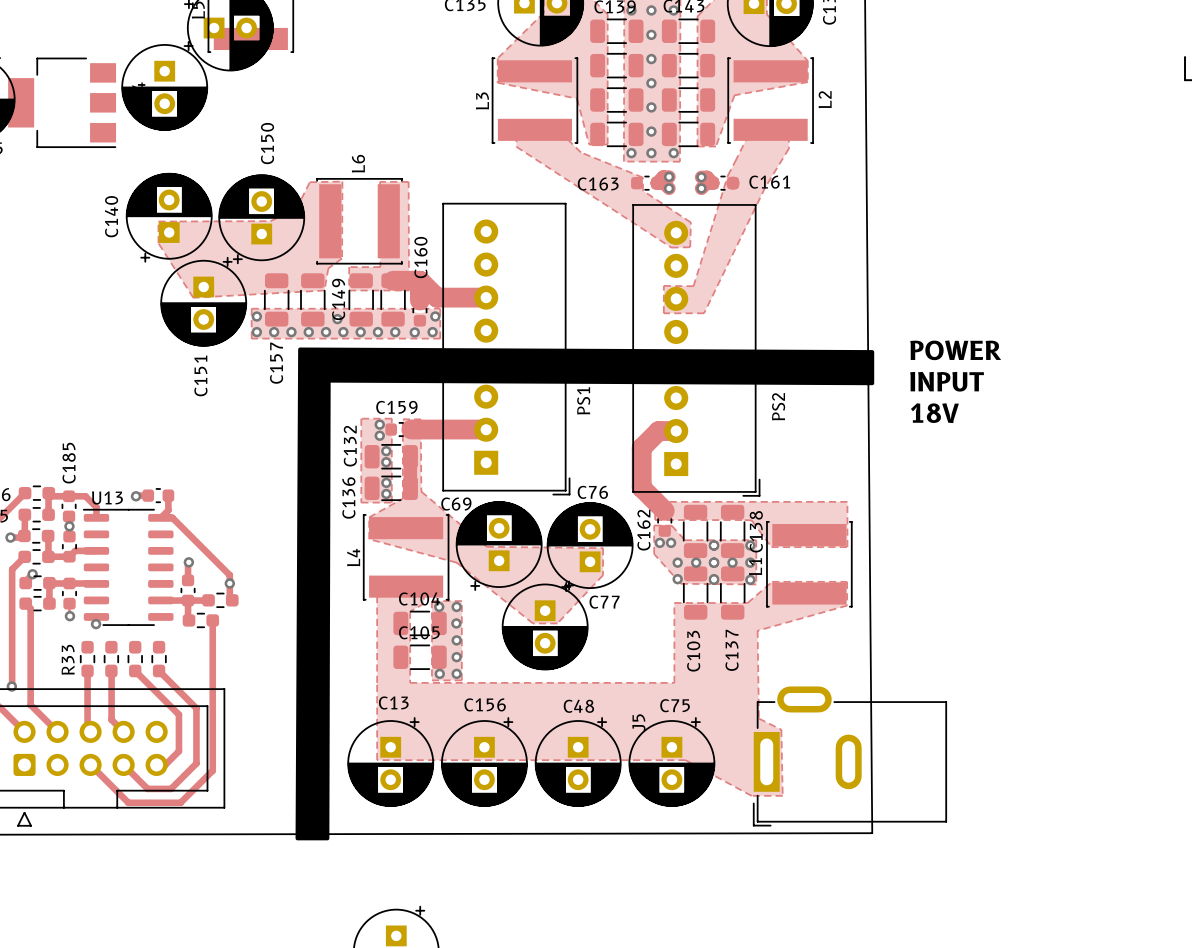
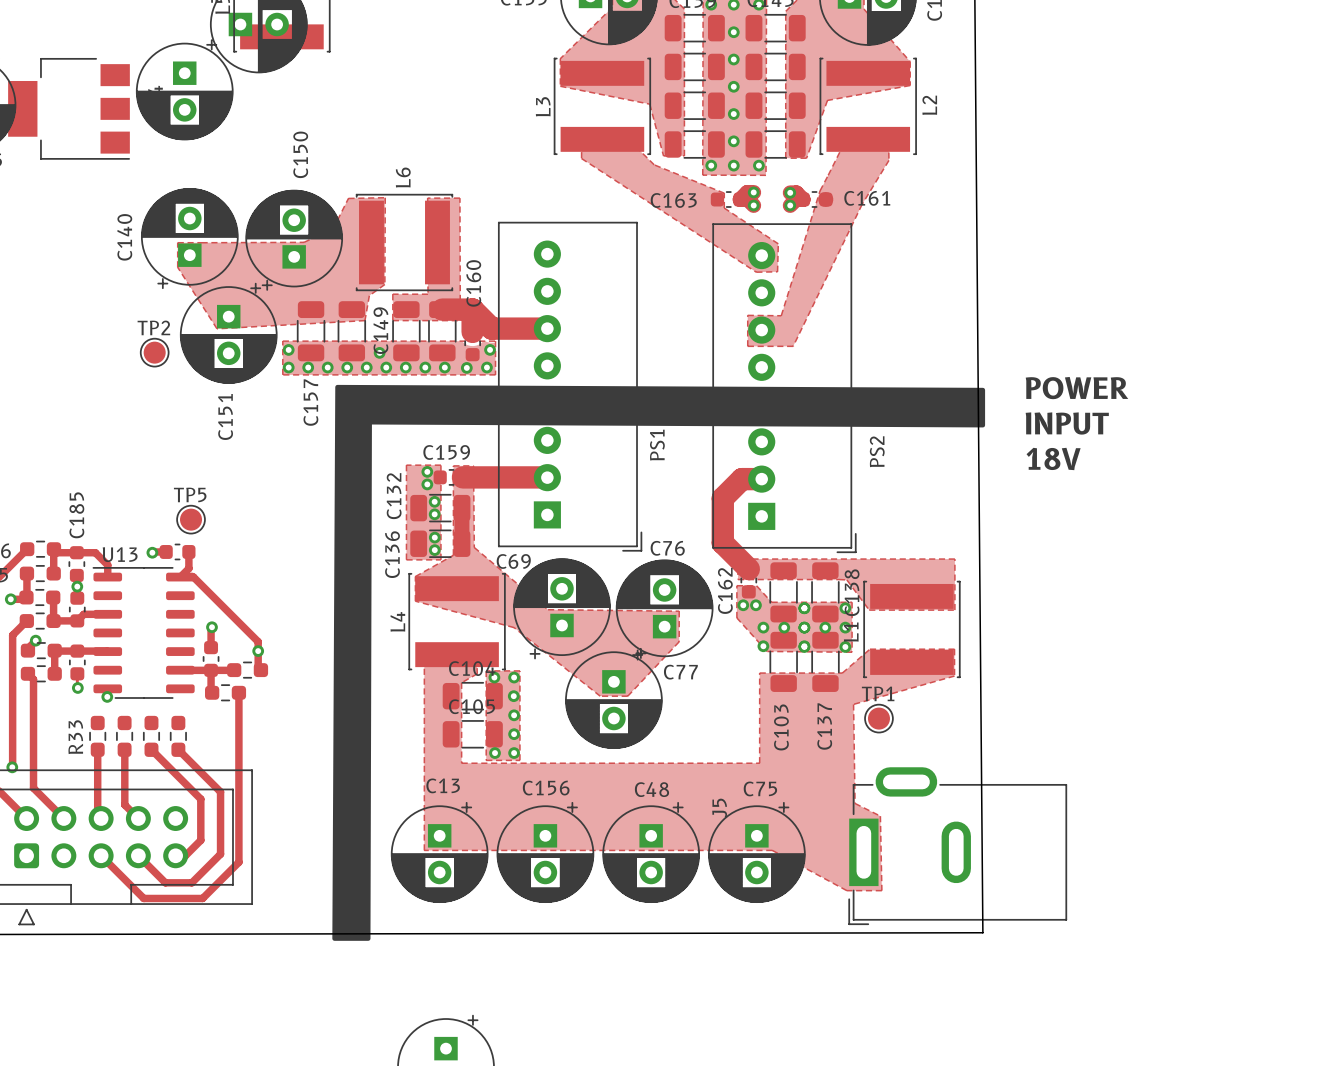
TP2: none -> (154, 352)
TP5: none -> (191, 519)
TP1: none -> (878, 718)

